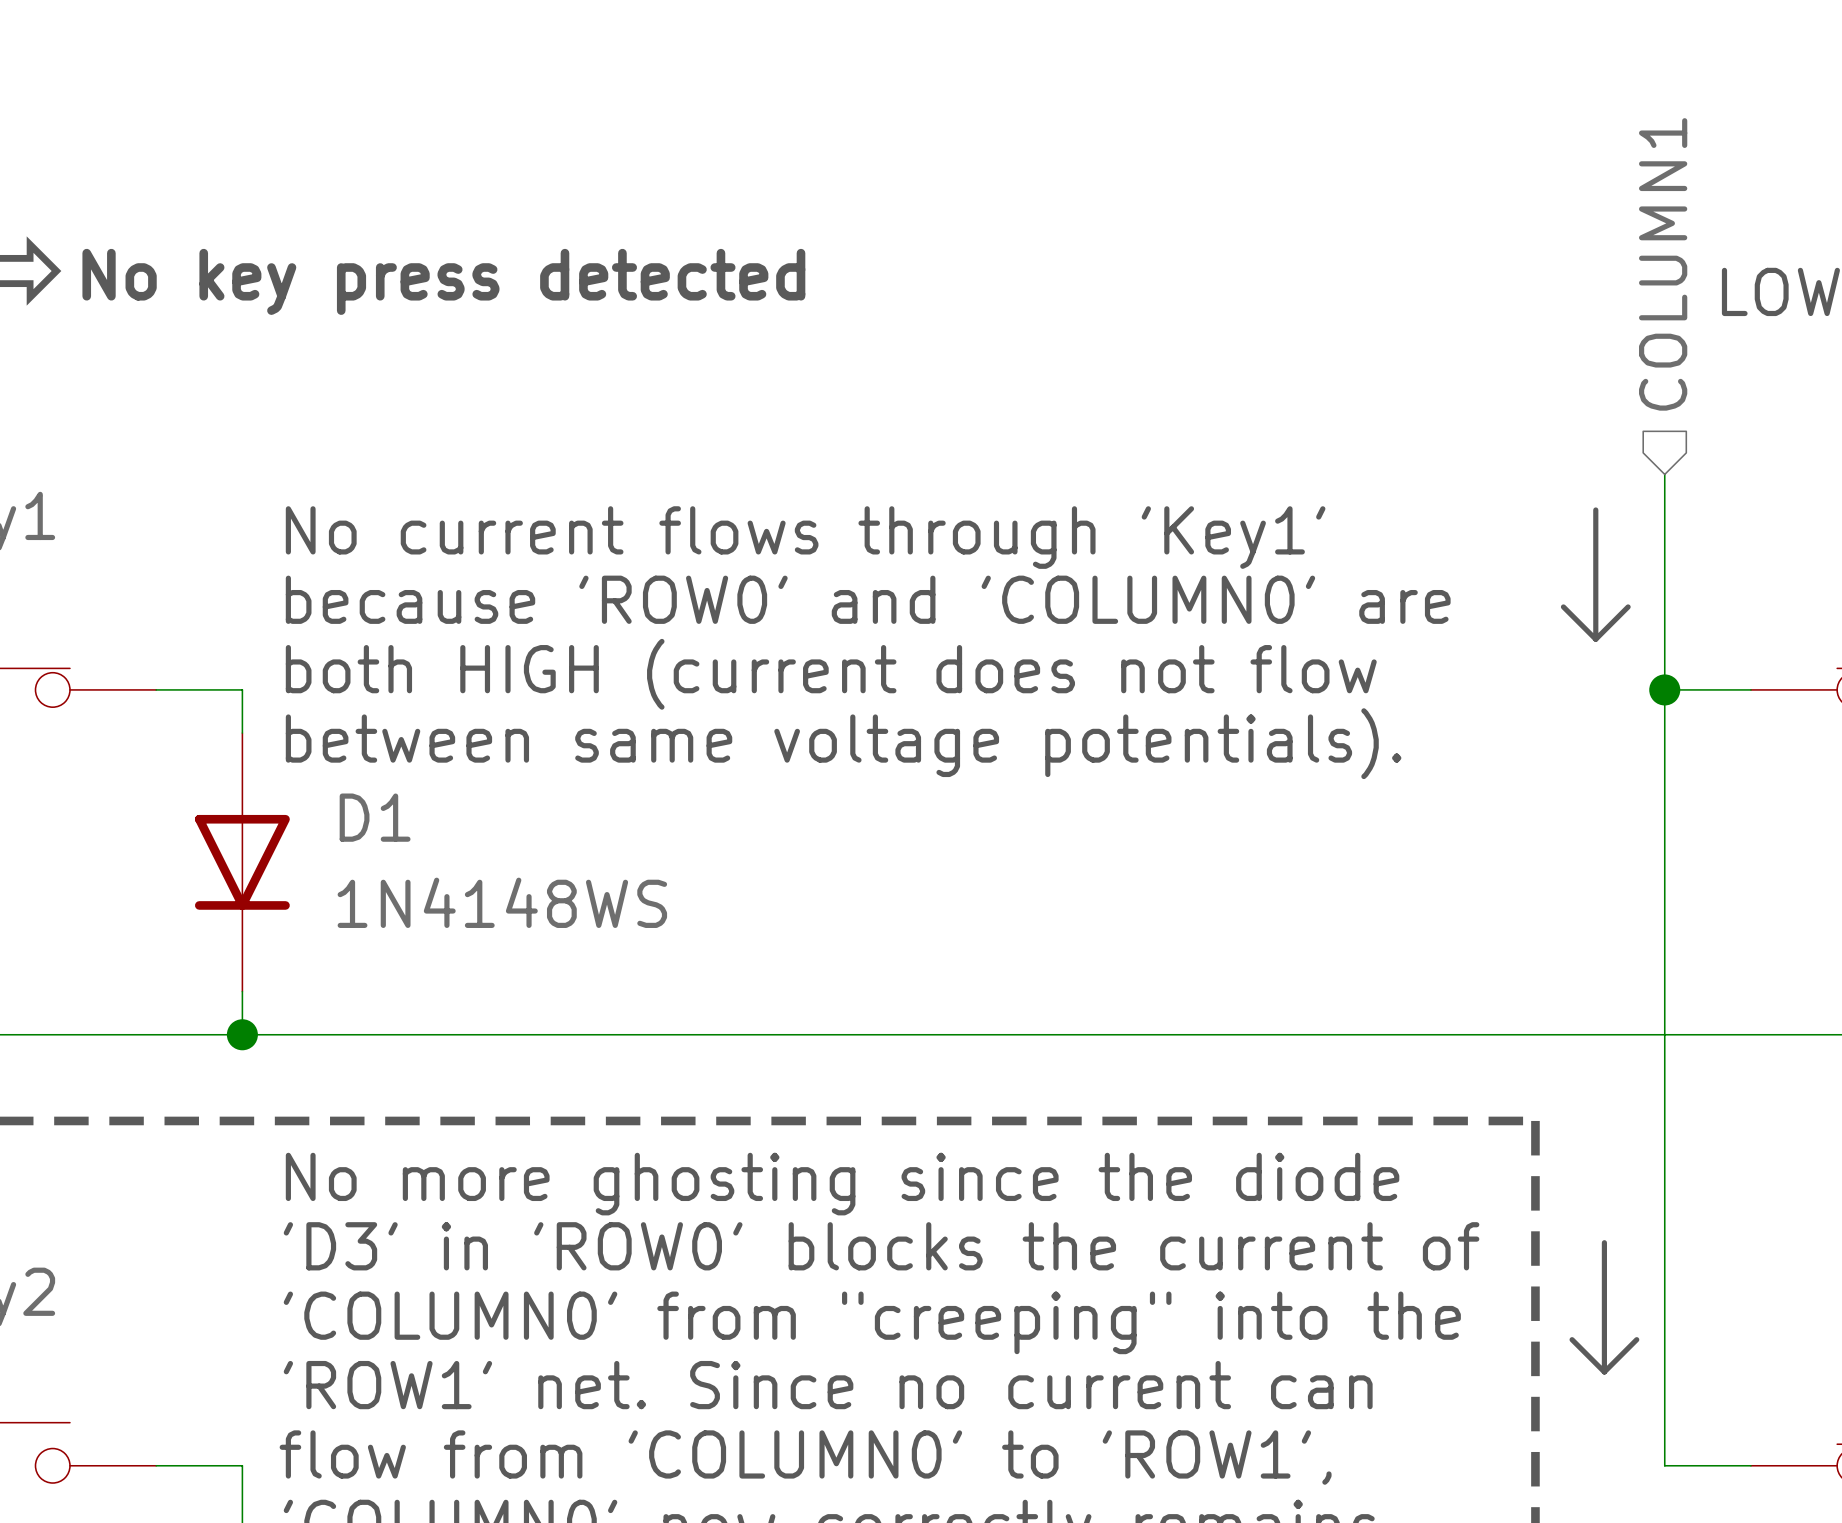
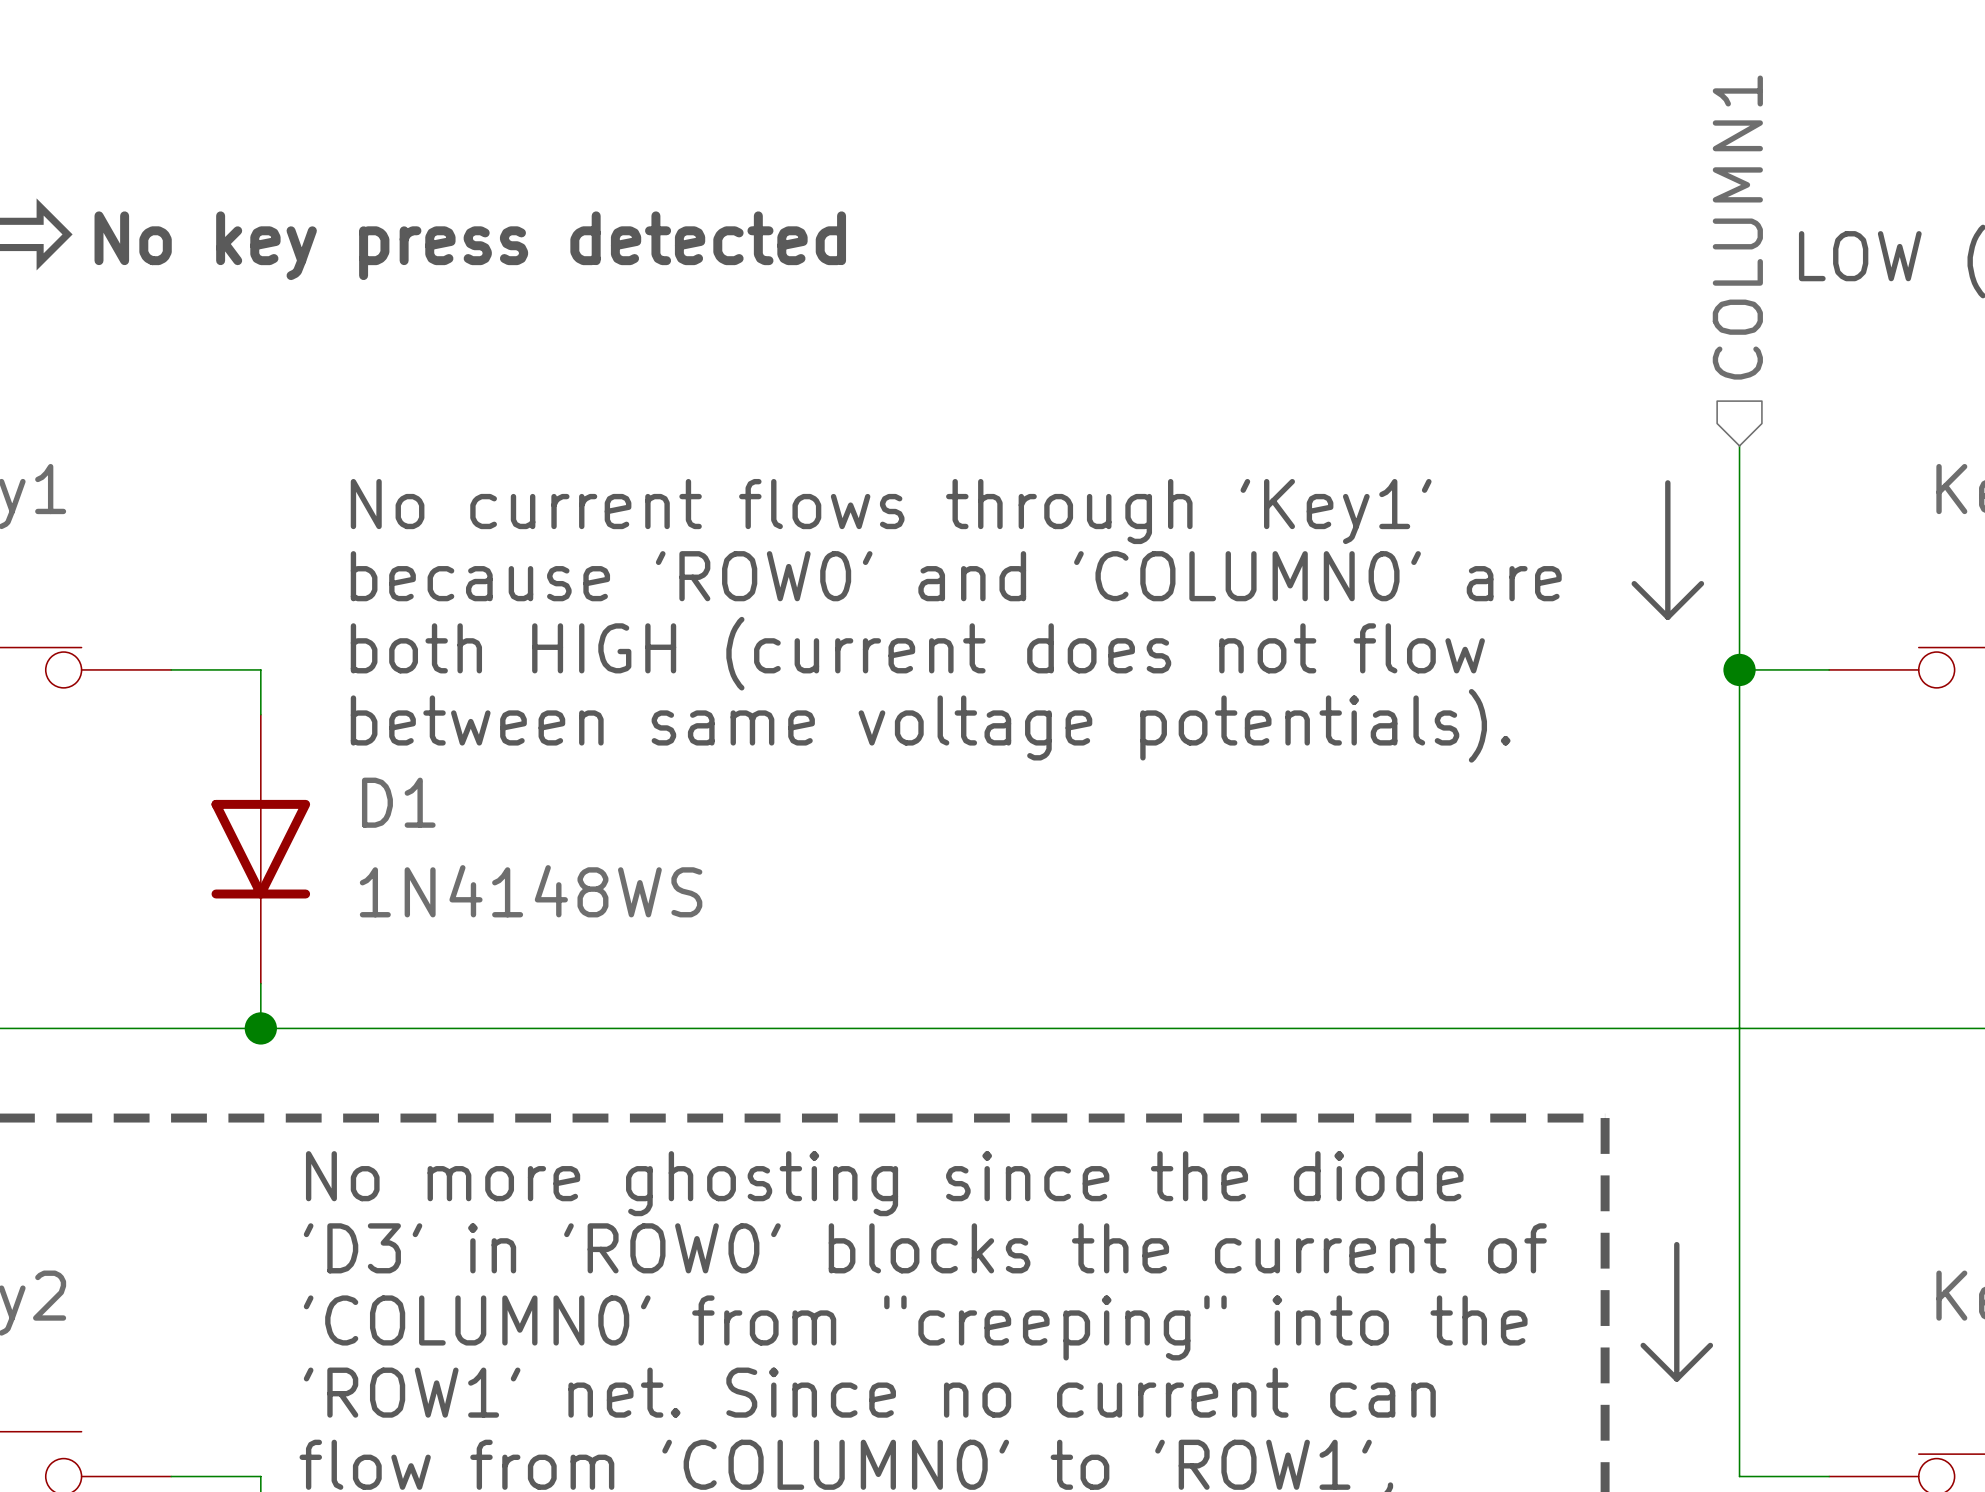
text position: No current flows through 'Key1' (805, 537) -> No current flows through 'Key1' (891, 511)
text position: because 'ROW0' and 'COLUMN0' are (868, 599) -> because 'ROW0' and 'COLUMN0' are (956, 576)
text position: both HIGH (current does not flow (831, 674) -> both HIGH (current does not flow (917, 653)
text position: between same voltage potentials). (843, 743) -> between same voltage potentials). (930, 725)

